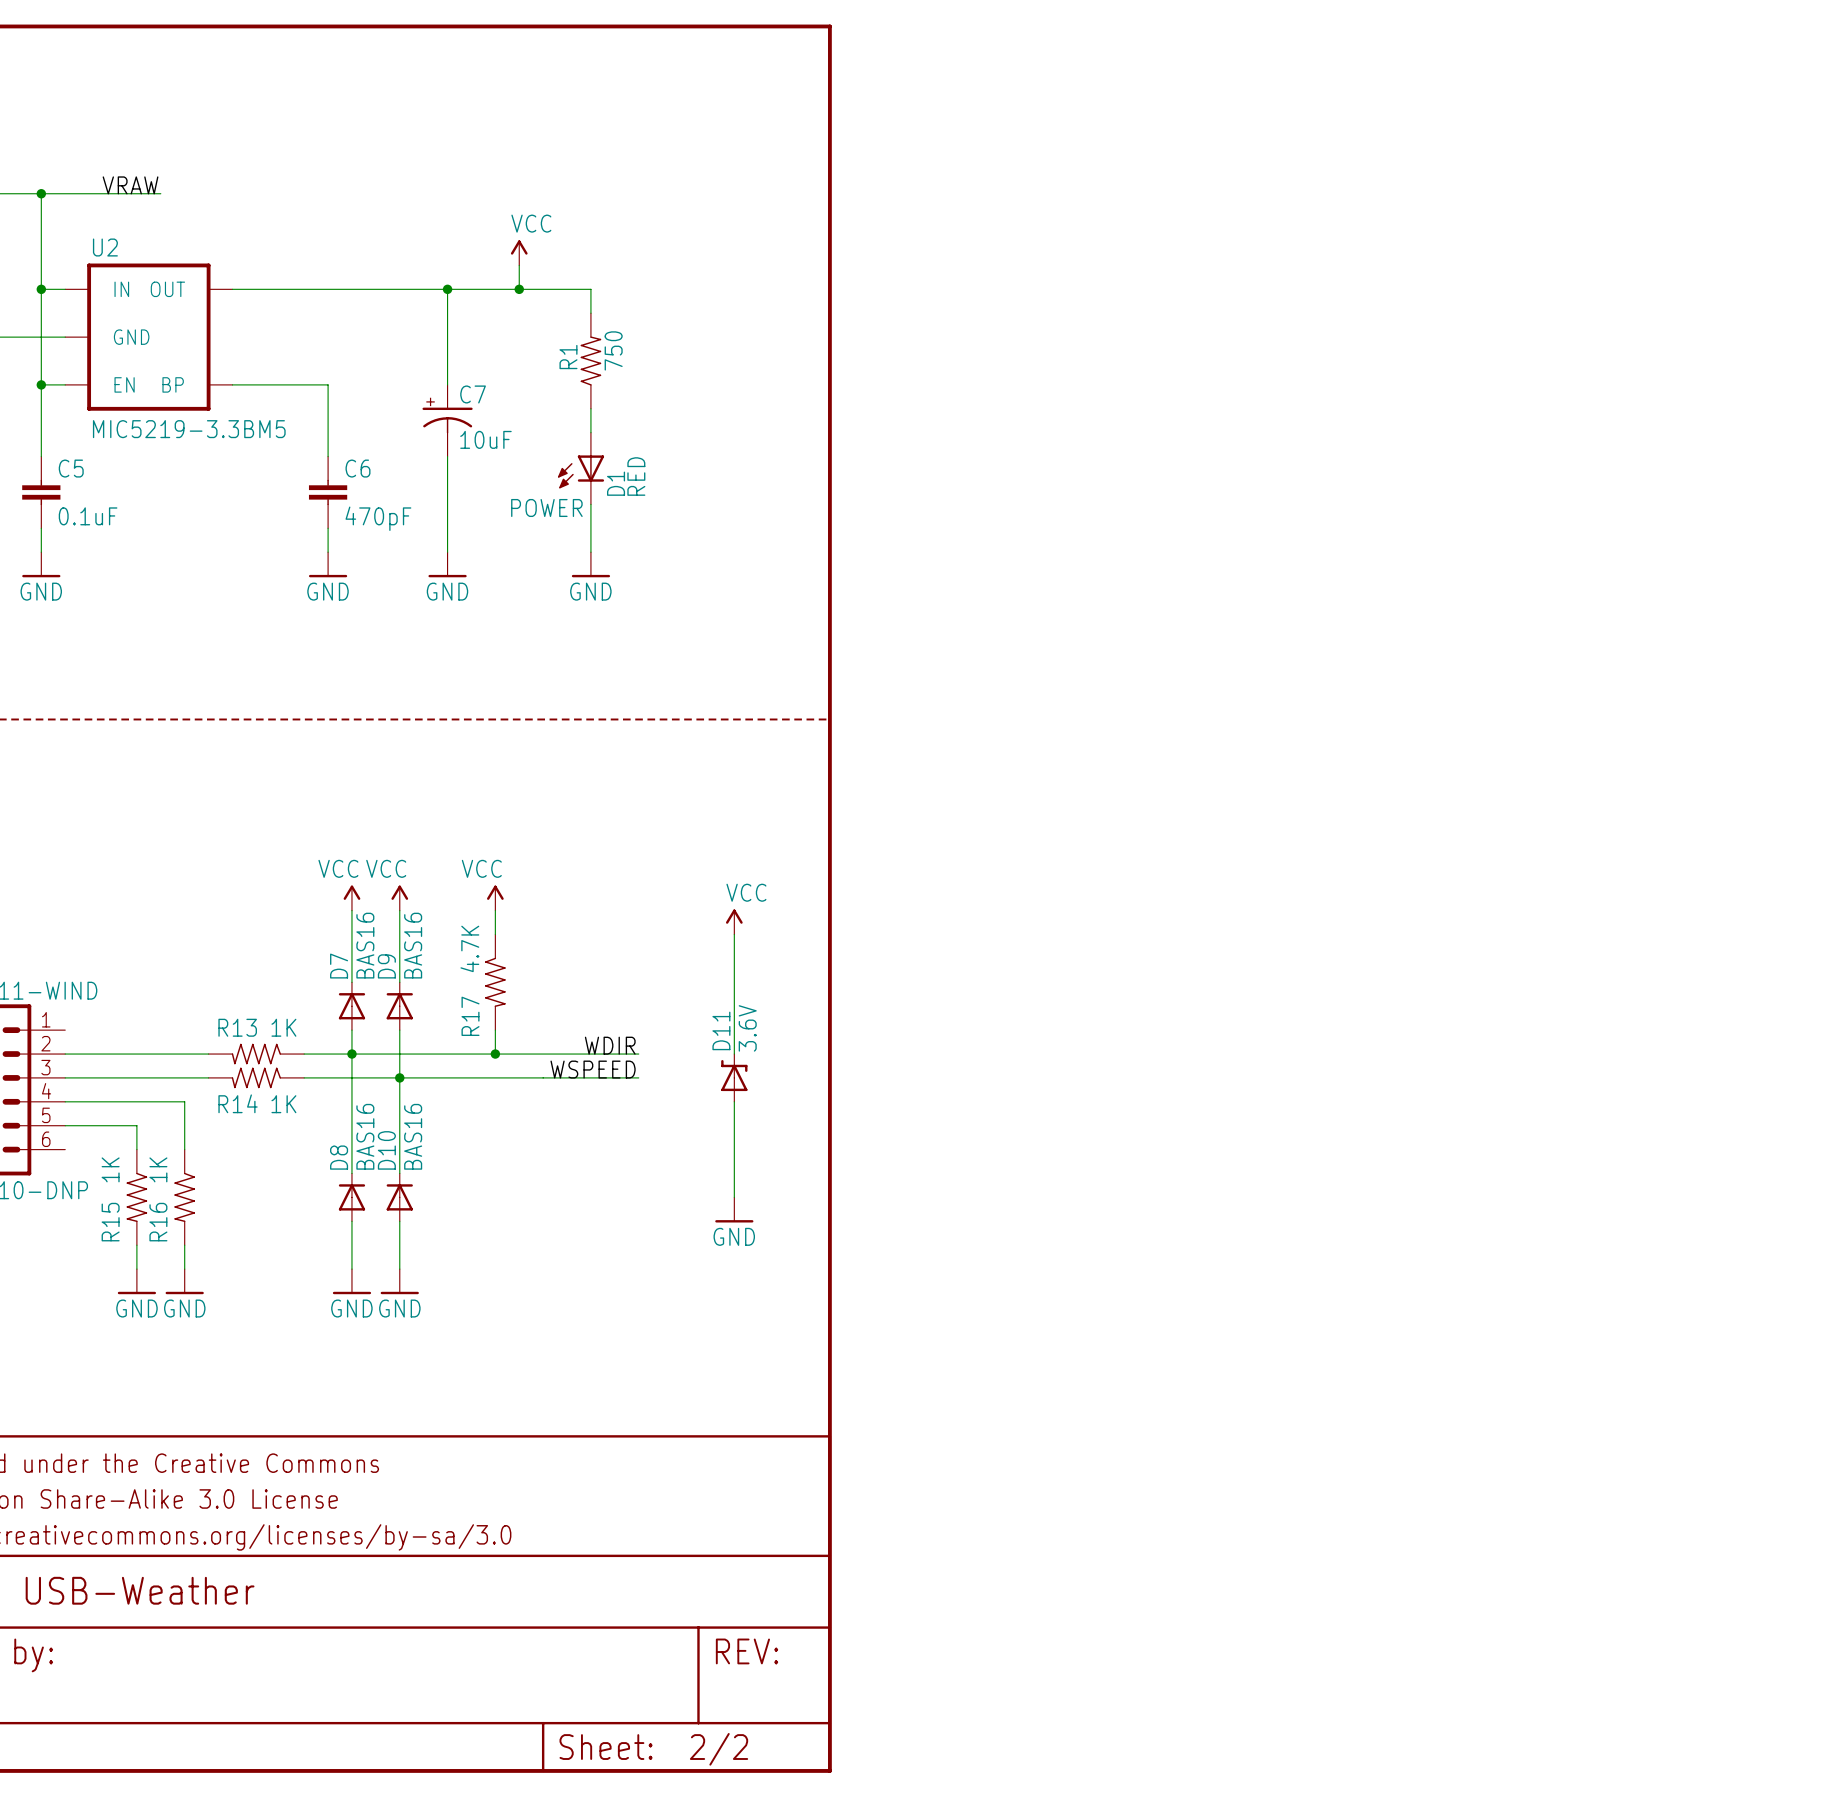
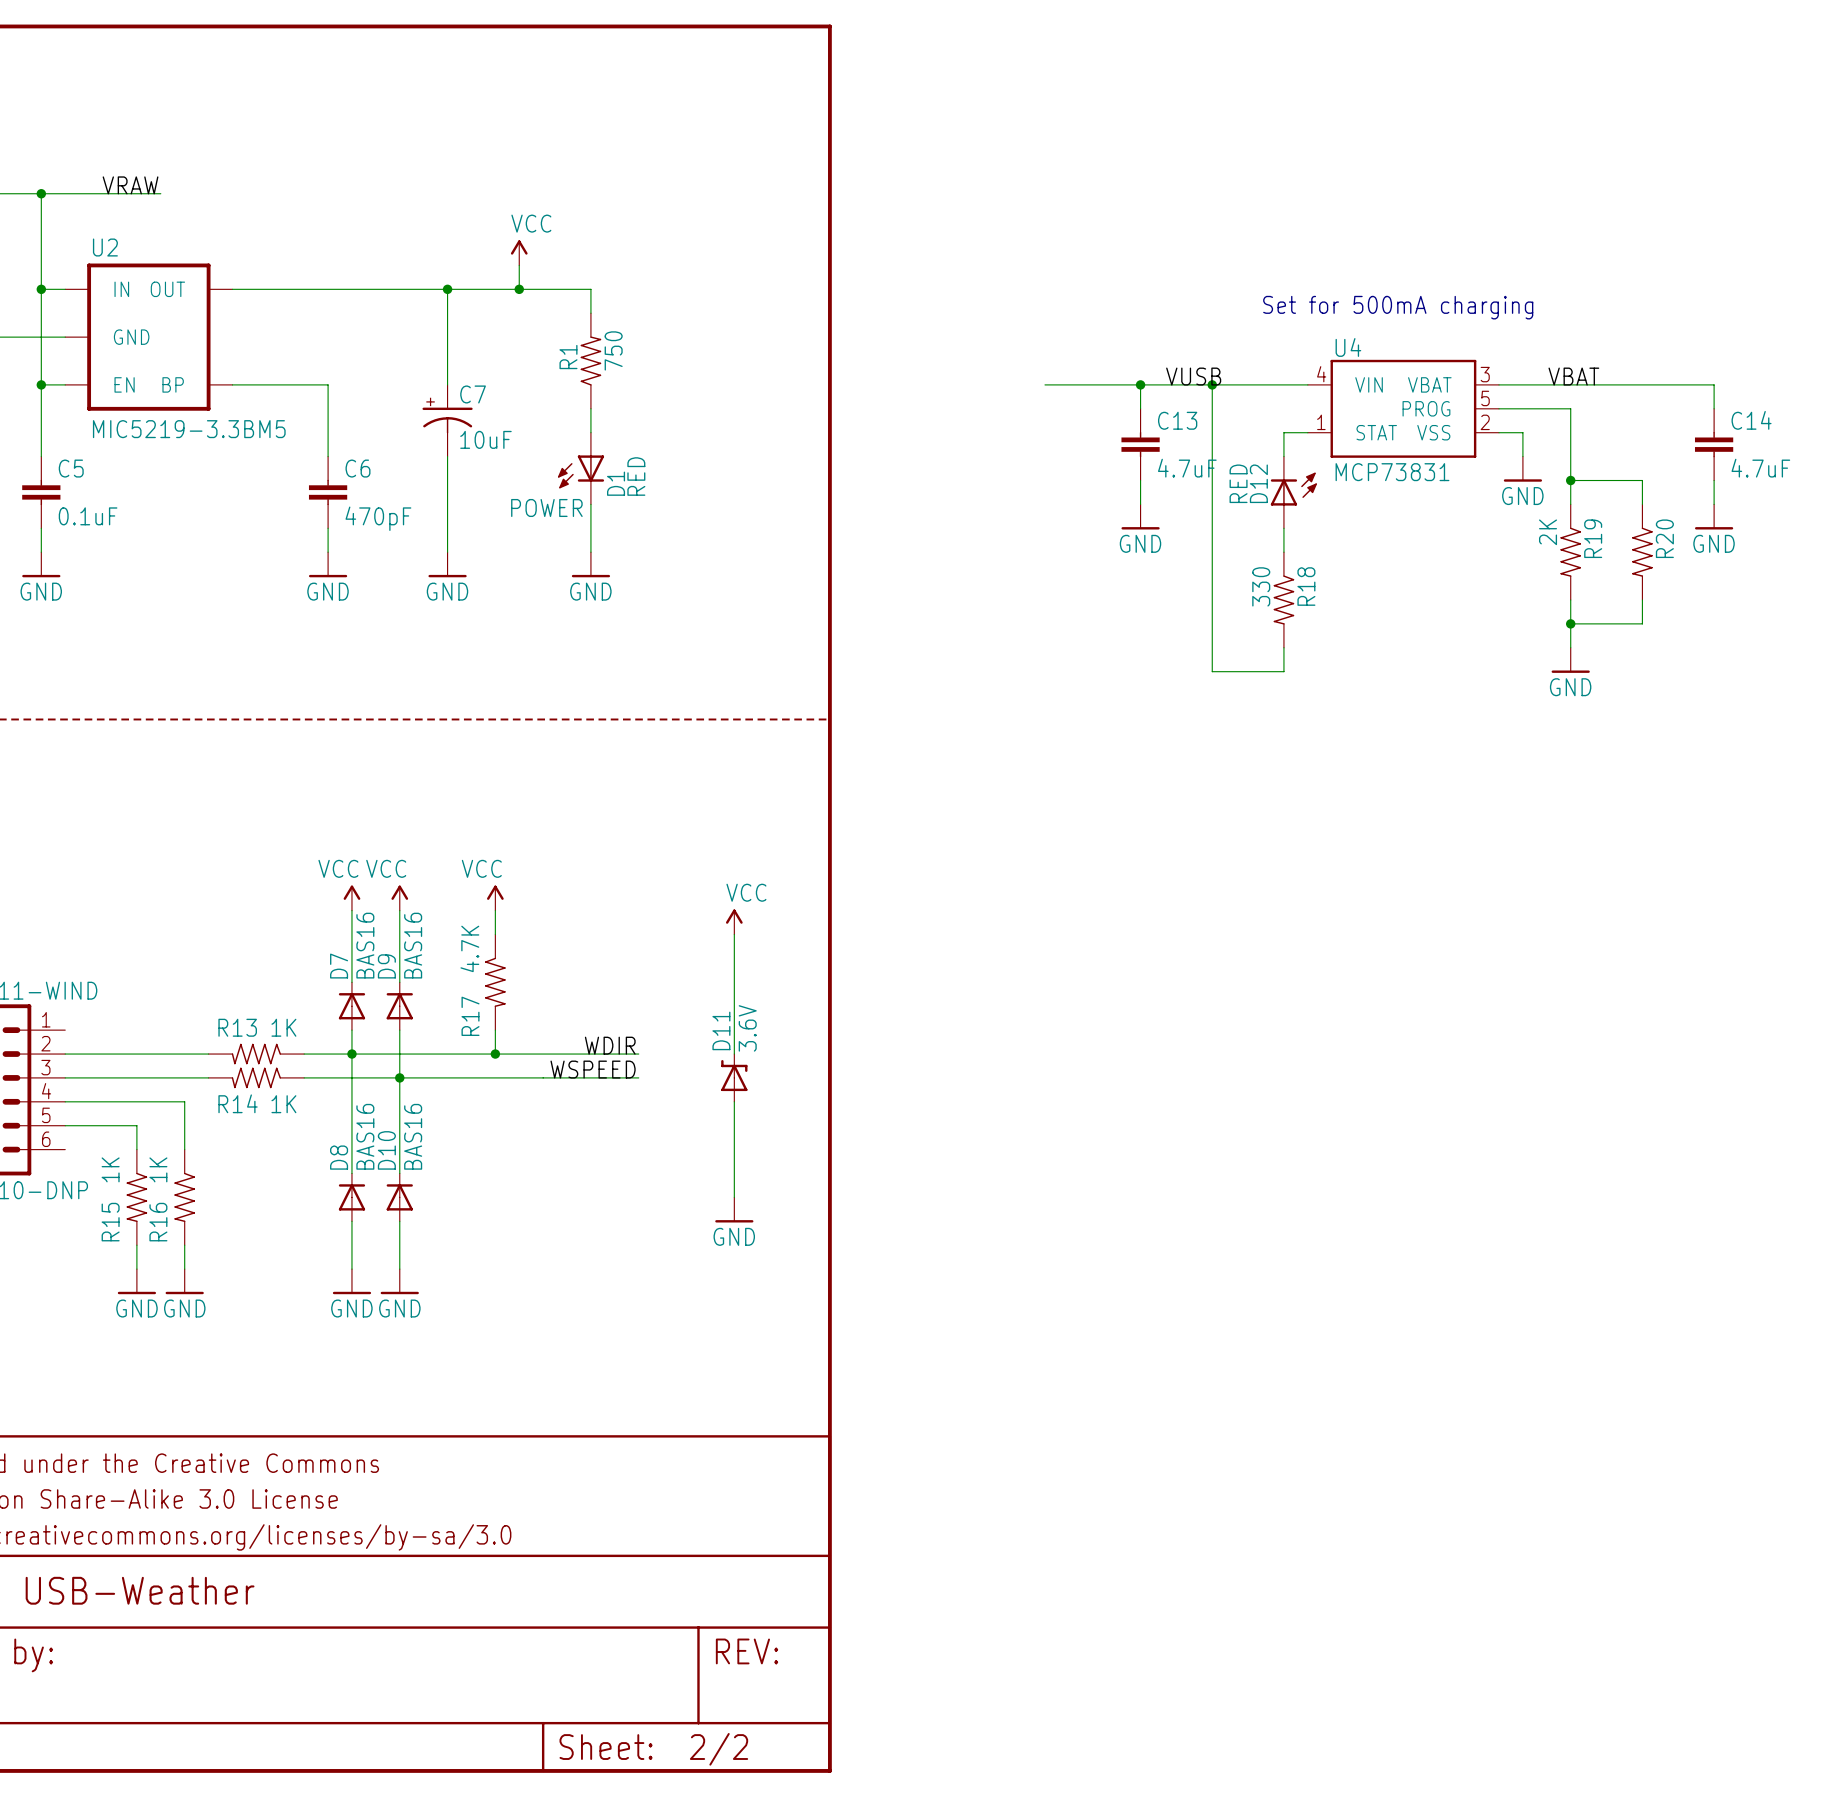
text: none -> Set for 500mA charging (1398, 307)
label: none -> VUSB (1193, 376)
label: none -> VBAT (1573, 376)
wire: none -> (1044, 384) (1307, 384)
wire: none -> (1140, 384) (1140, 408)
junction: none -> (1140, 384)
wire: none -> (1212, 384) (1212, 671) (1283, 671) (1283, 647)
junction: none -> (1212, 384)
wire: none -> (1499, 384) (1714, 384) (1714, 408)
U4: none -> MCP73831 (1403, 408)
wire: none -> (1499, 408) (1570, 408) (1570, 504)
wire: none -> (1307, 432) (1283, 432) (1283, 456)
wire: none -> (1499, 432) (1522, 432) (1522, 456)
C13: none -> 4.7uF (1140, 444)
C14: none -> 4.7uF (1714, 444)
power symbol: none -> GND (1522, 469)
wire: none -> (1140, 480) (1140, 504)
wire: none -> (1570, 480) (1642, 480) (1642, 504)
junction: none -> (1570, 480)
wire: none -> (1714, 480) (1714, 504)
D12: none -> RED (1293, 492)
power symbol: none -> GND (1140, 516)
power symbol: none -> GND (1714, 516)
wire: none -> (1283, 528) (1283, 552)
R19: none -> 2K (1570, 552)
R20: none -> (1642, 552)
R18: none -> 330 (1283, 599)
wire: none -> (1570, 599) (1570, 647)
wire: none -> (1642, 599) (1642, 623) (1570, 623)
junction: none -> (1570, 623)
power symbol: none -> GND (1570, 660)

